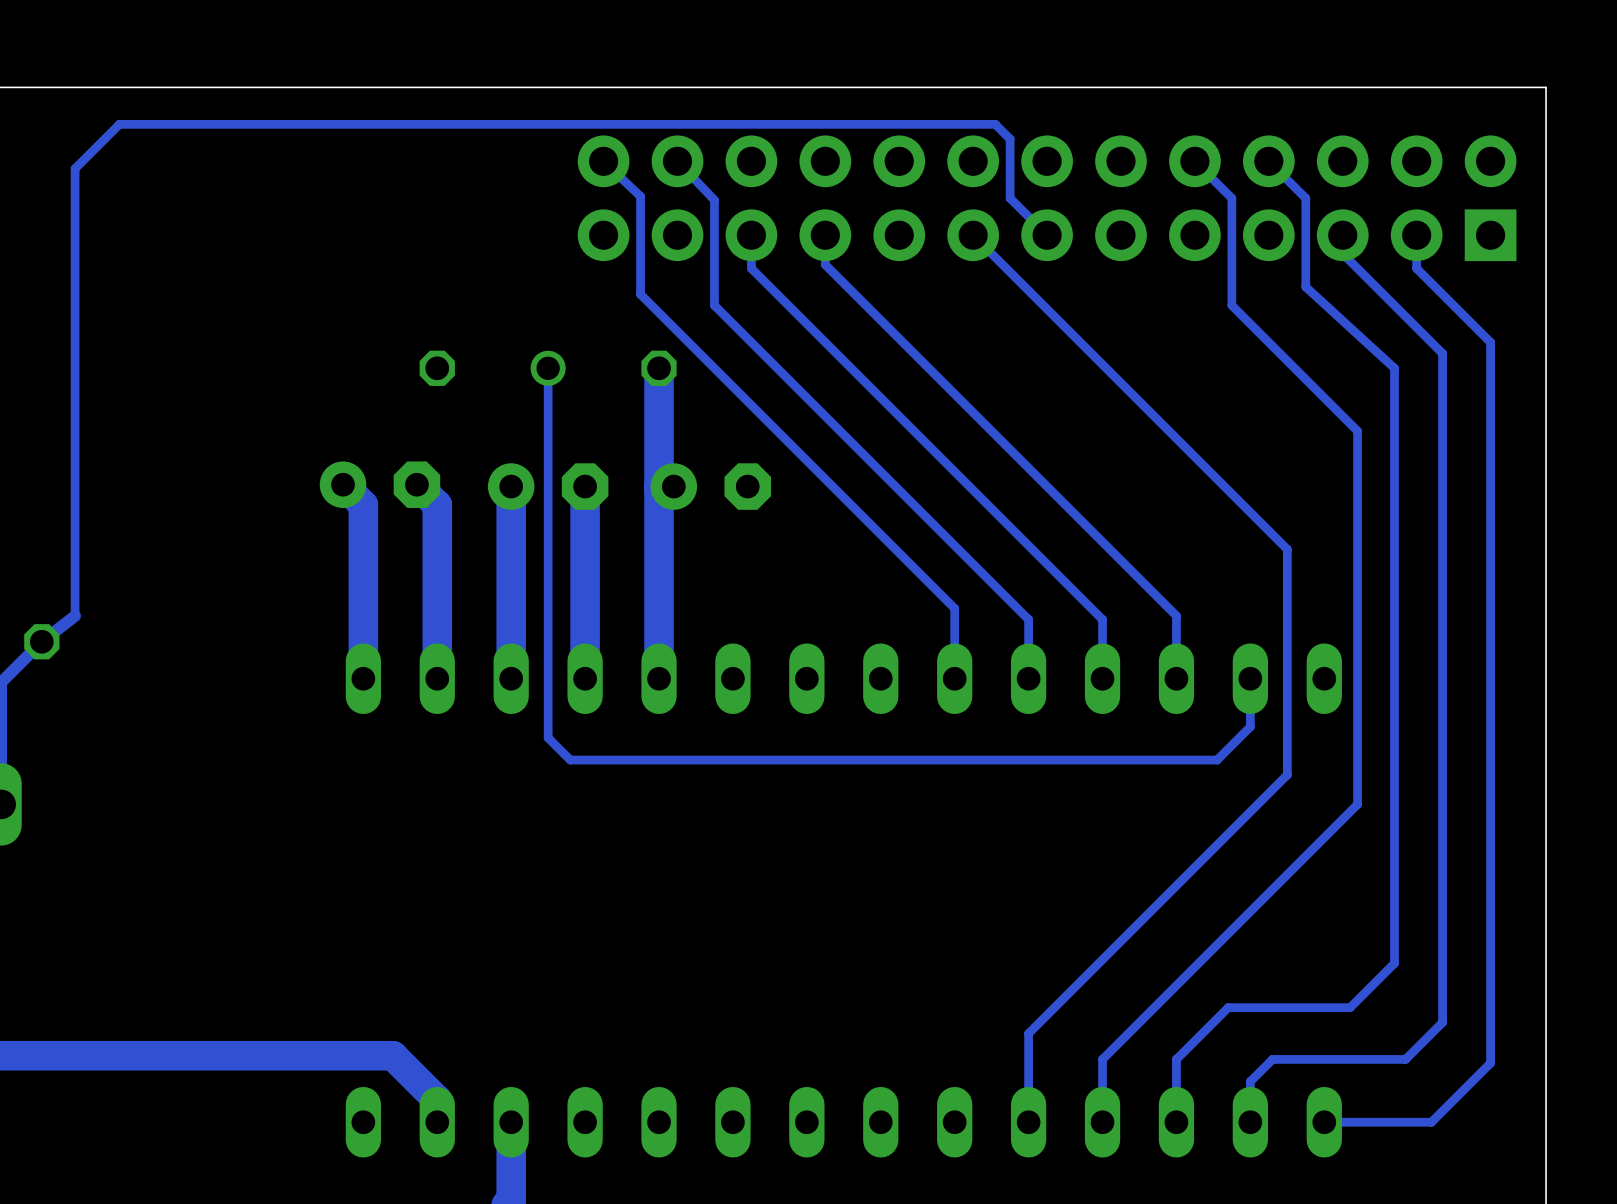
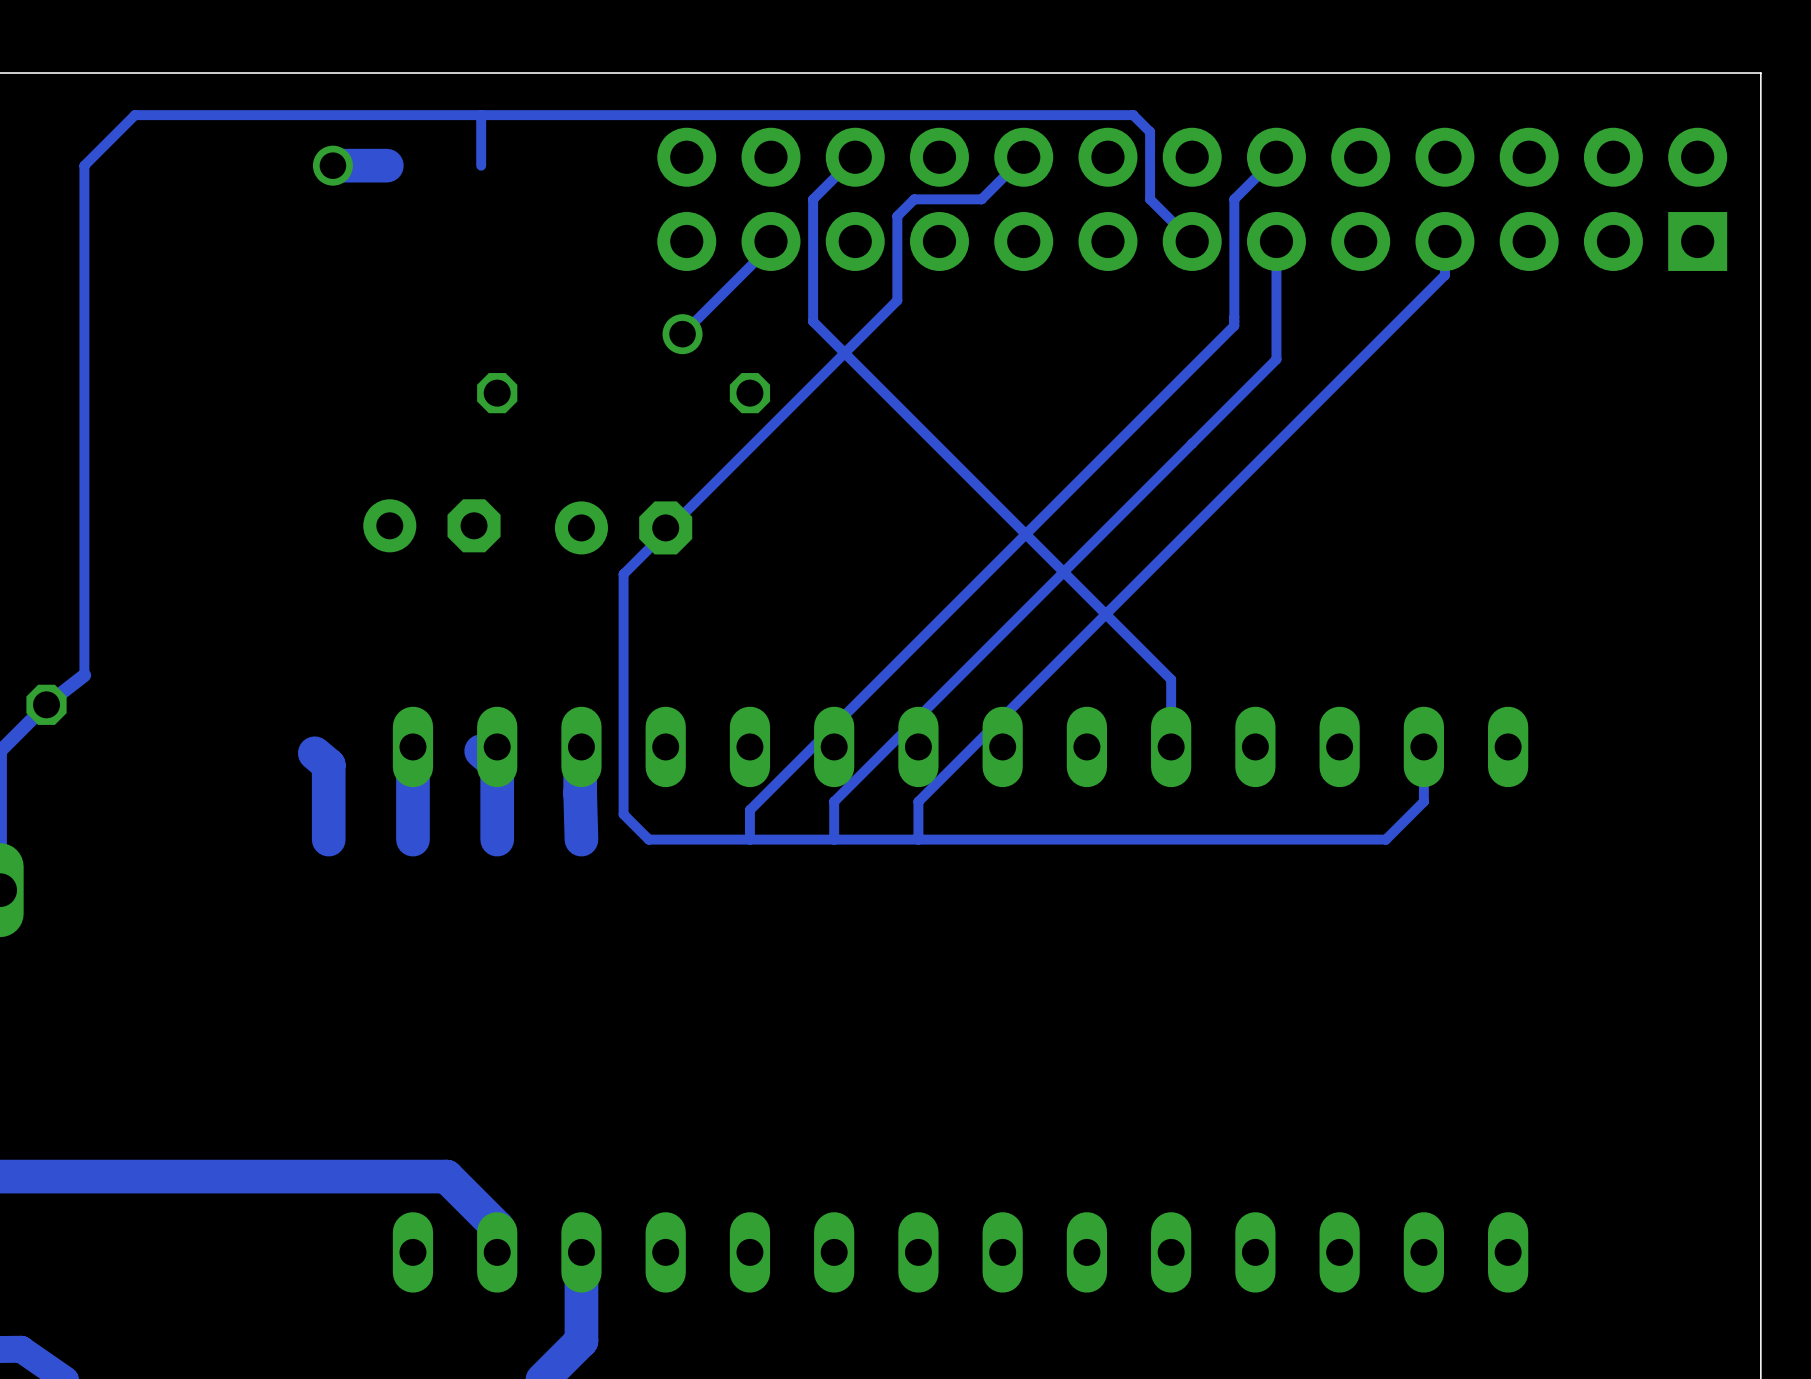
track: none -> (481, 115) (481, 165)
track: (603, 161) (640, 196) (640, 294) (954, 608) (954, 678) -> none
track: (677, 161) (714, 200) -> (855, 157) (813, 201)
track: none -> (1276, 157) (1234, 199) (1234, 325) (749, 810) (749, 839)
track: (1194, 161) (1231, 198) (1231, 305) (1357, 431) (1357, 804) (1102, 1059) (1102, 1122) -> none
track: (1268, 161) (1305, 198) (1305, 286) (1394, 368) (1394, 963) (1350, 1007) (1228, 1007) (1176, 1059) (1176, 1122) -> none
via: none -> (332, 165)
track: none -> (386, 165) (332, 165)
track: none -> (771, 241) (771, 245) (682, 334)
track: (751, 235) (751, 268) (1102, 619) (1102, 678) -> none
track: (825, 235) (825, 264) (1176, 615) (1176, 678) -> none
track: (973, 235) (1287, 549) (1287, 774) (1028, 1033) (1028, 1122) -> none
track: none -> (1276, 241) (1276, 359) (834, 801) (834, 839)
track: none -> (1444, 241) (1444, 275) (918, 801) (918, 839)
track: (1342, 235) (1342, 253) (1442, 353) (1442, 1022) (1405, 1059) (1272, 1059) (1250, 1081) (1250, 1122) -> none
track: (1416, 235) (1416, 268) (1490, 342) (1490, 1063) (1431, 1122) (1324, 1122) -> none
track: (548, 368) (548, 527) -> (1023, 157) (981, 199) (914, 199) (897, 216) (897, 300) (623, 574)
via position: (548, 368) -> (682, 334)
track: (659, 368) (659, 678) -> none
track: (343, 484) (363, 505) (363, 678) -> none
track: (416, 484) (437, 505) (437, 678) -> none
track: (511, 486) (511, 678) -> none
track: (585, 486) (585, 678) -> none
part: (710, 486) -> none
track: none -> (481, 751) (497, 765) (497, 839)
track: none -> (580, 751) (581, 839)
track: none -> (314, 753) (328, 765) (328, 839)
track: none -> (414, 753) (412, 839)

